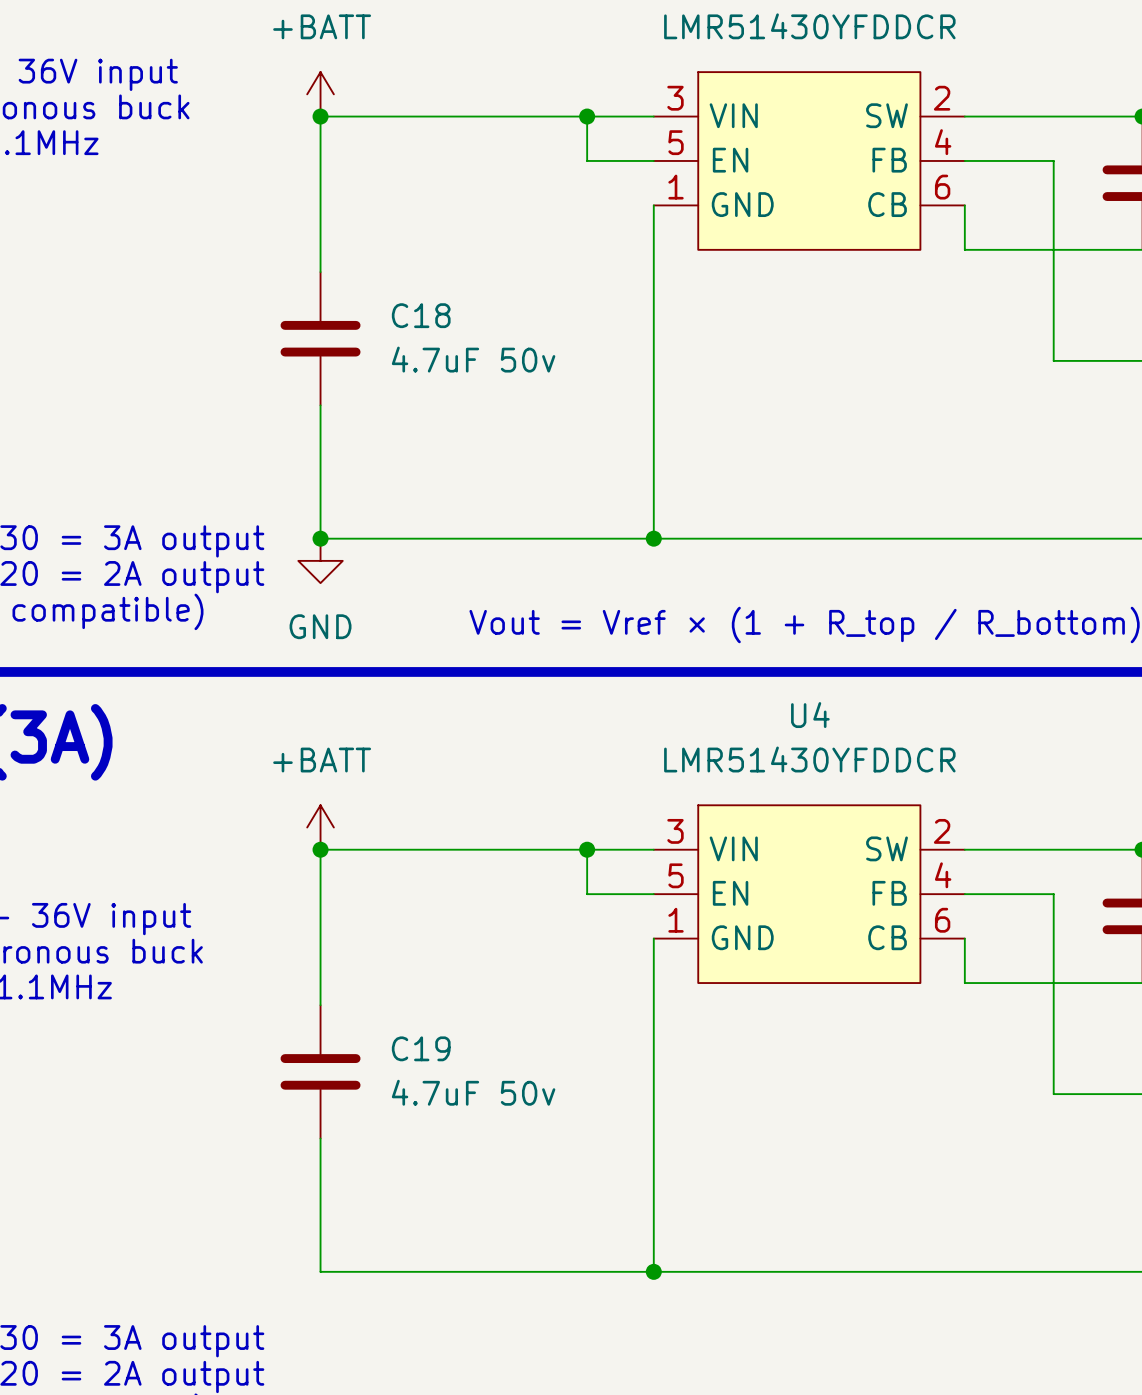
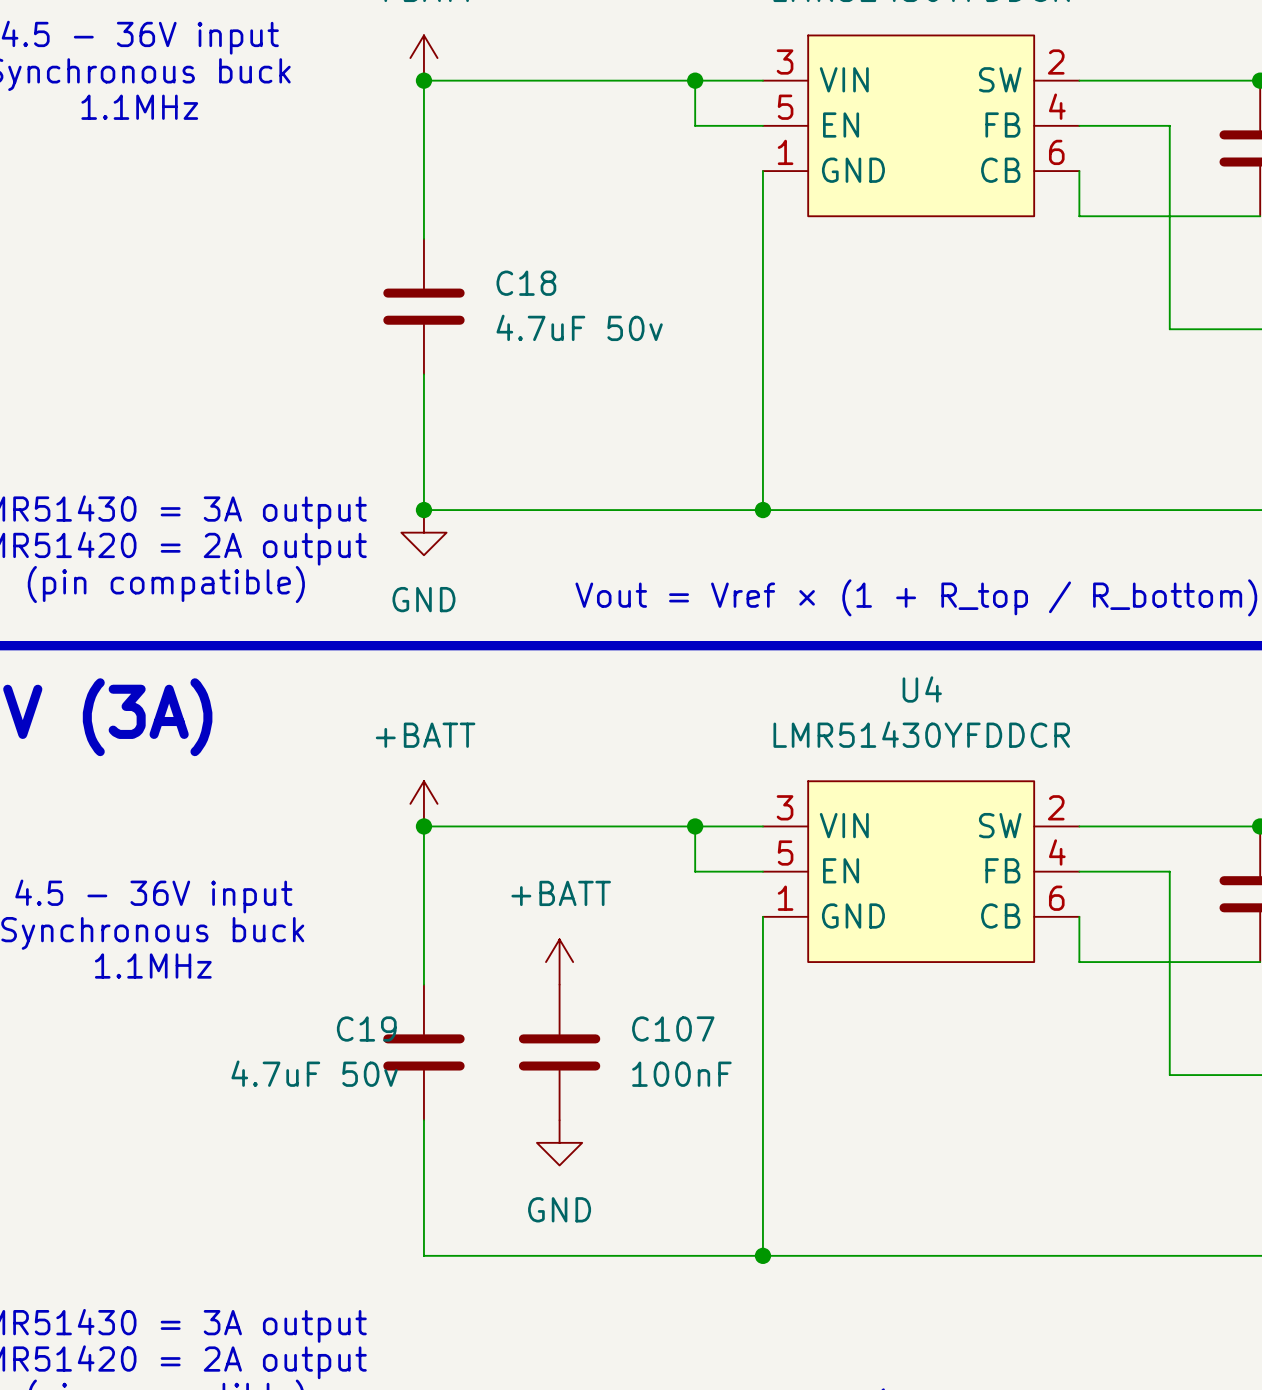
power symbol: none -> +BATT (559, 962)
C19 name position: C19 (421, 1048) -> C19 (366, 1029)
C107: none -> 100nF (559, 1052)
C19 value position: 4.7uF 50v (473, 1092) -> 4.7uF 50v (314, 1073)
power symbol: none -> GND (559, 1142)

